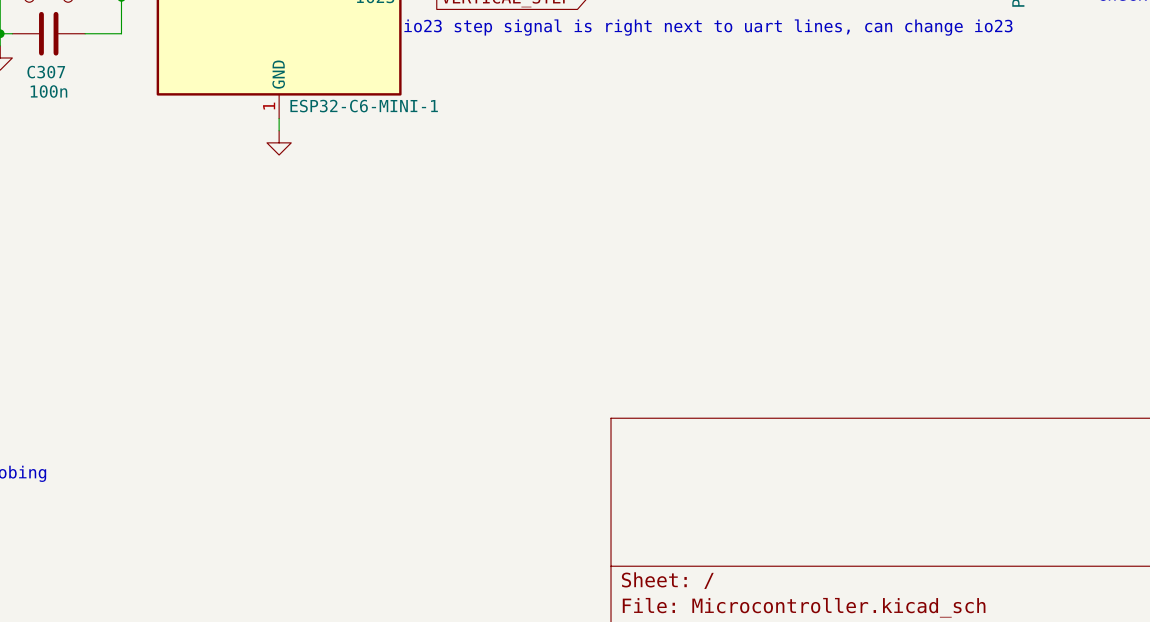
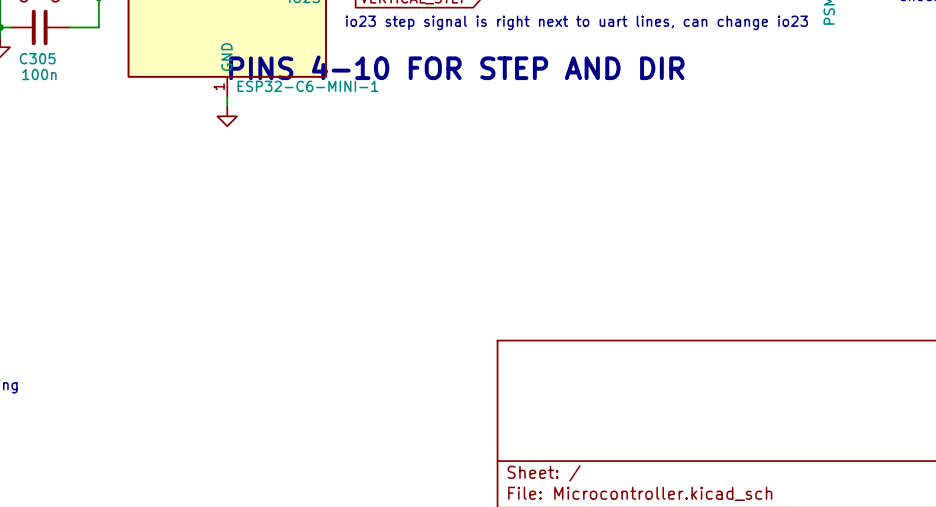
C307 name: C307 (46, 72) -> C305 (37, 58)
text: none -> PINS 4-10 FOR STEP AND DIR (456, 67)

